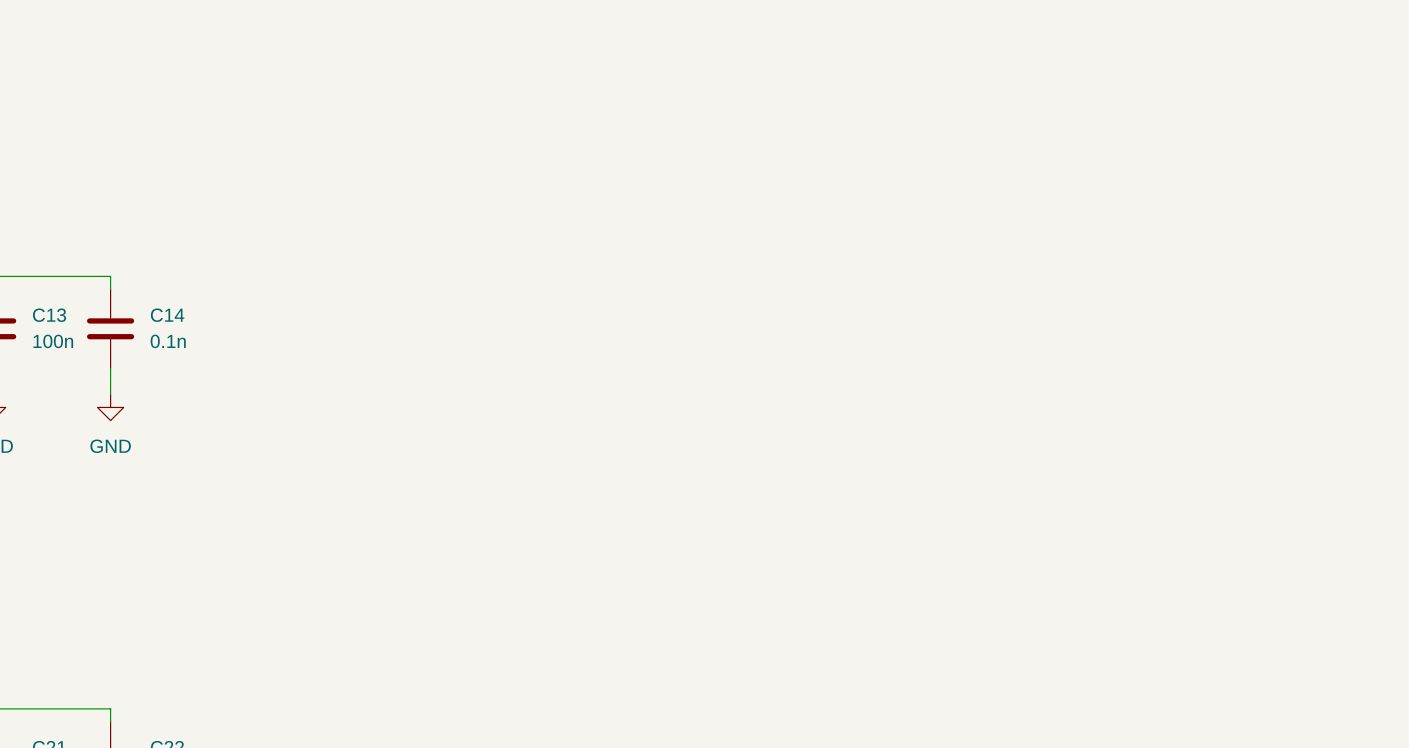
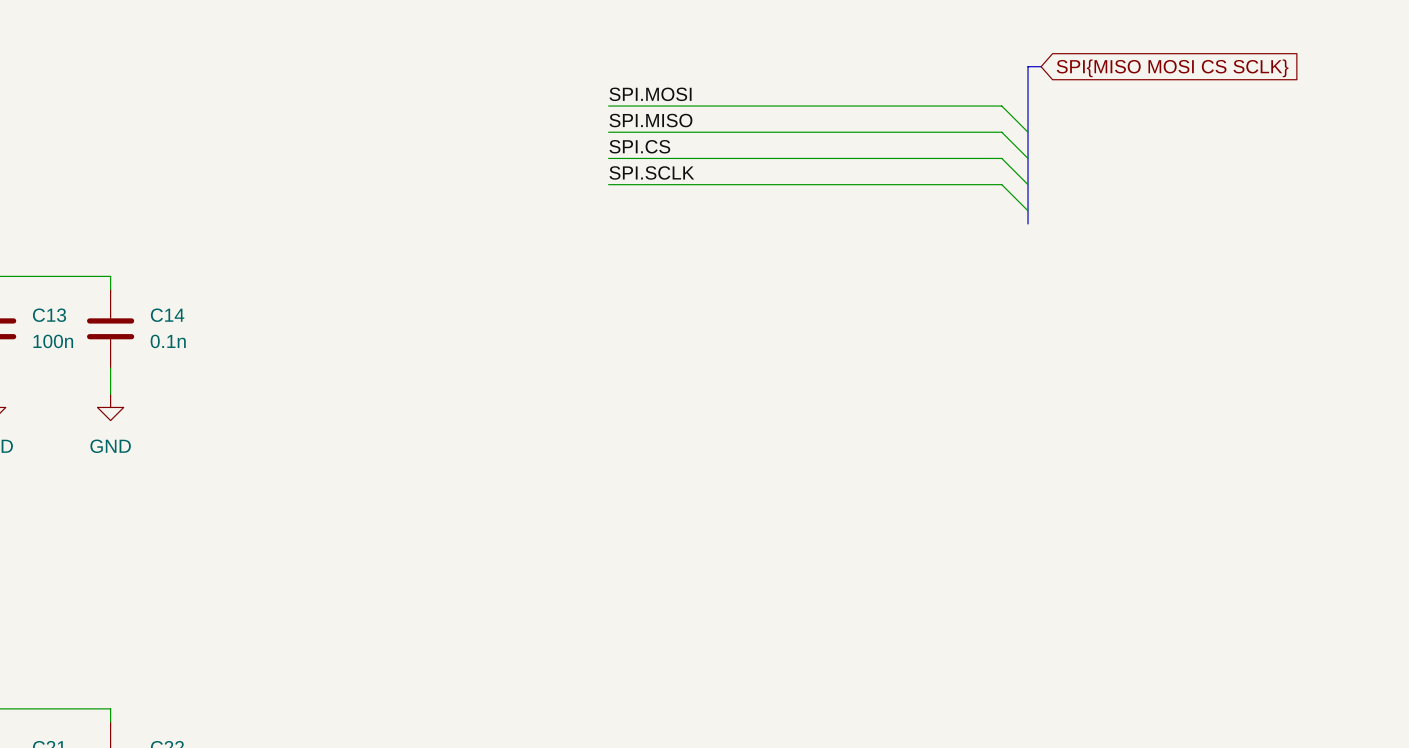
bus: none -> (1041, 66) (1028, 66) (1028, 223)
global label: none -> SPI{MISO MOSI CS SCLK} (1172, 68)
label: none -> SPI.MOSI (650, 94)
wire: none -> (608, 106) (1001, 106) (1028, 132)
label: none -> SPI.MISO (650, 120)
wire: none -> (608, 132) (1001, 132) (1028, 158)
label: none -> SPI.CS (639, 146)
wire: none -> (608, 158) (1001, 158) (1028, 184)
label: none -> SPI.SCLK (651, 172)
wire: none -> (608, 184) (1001, 184) (1028, 210)

